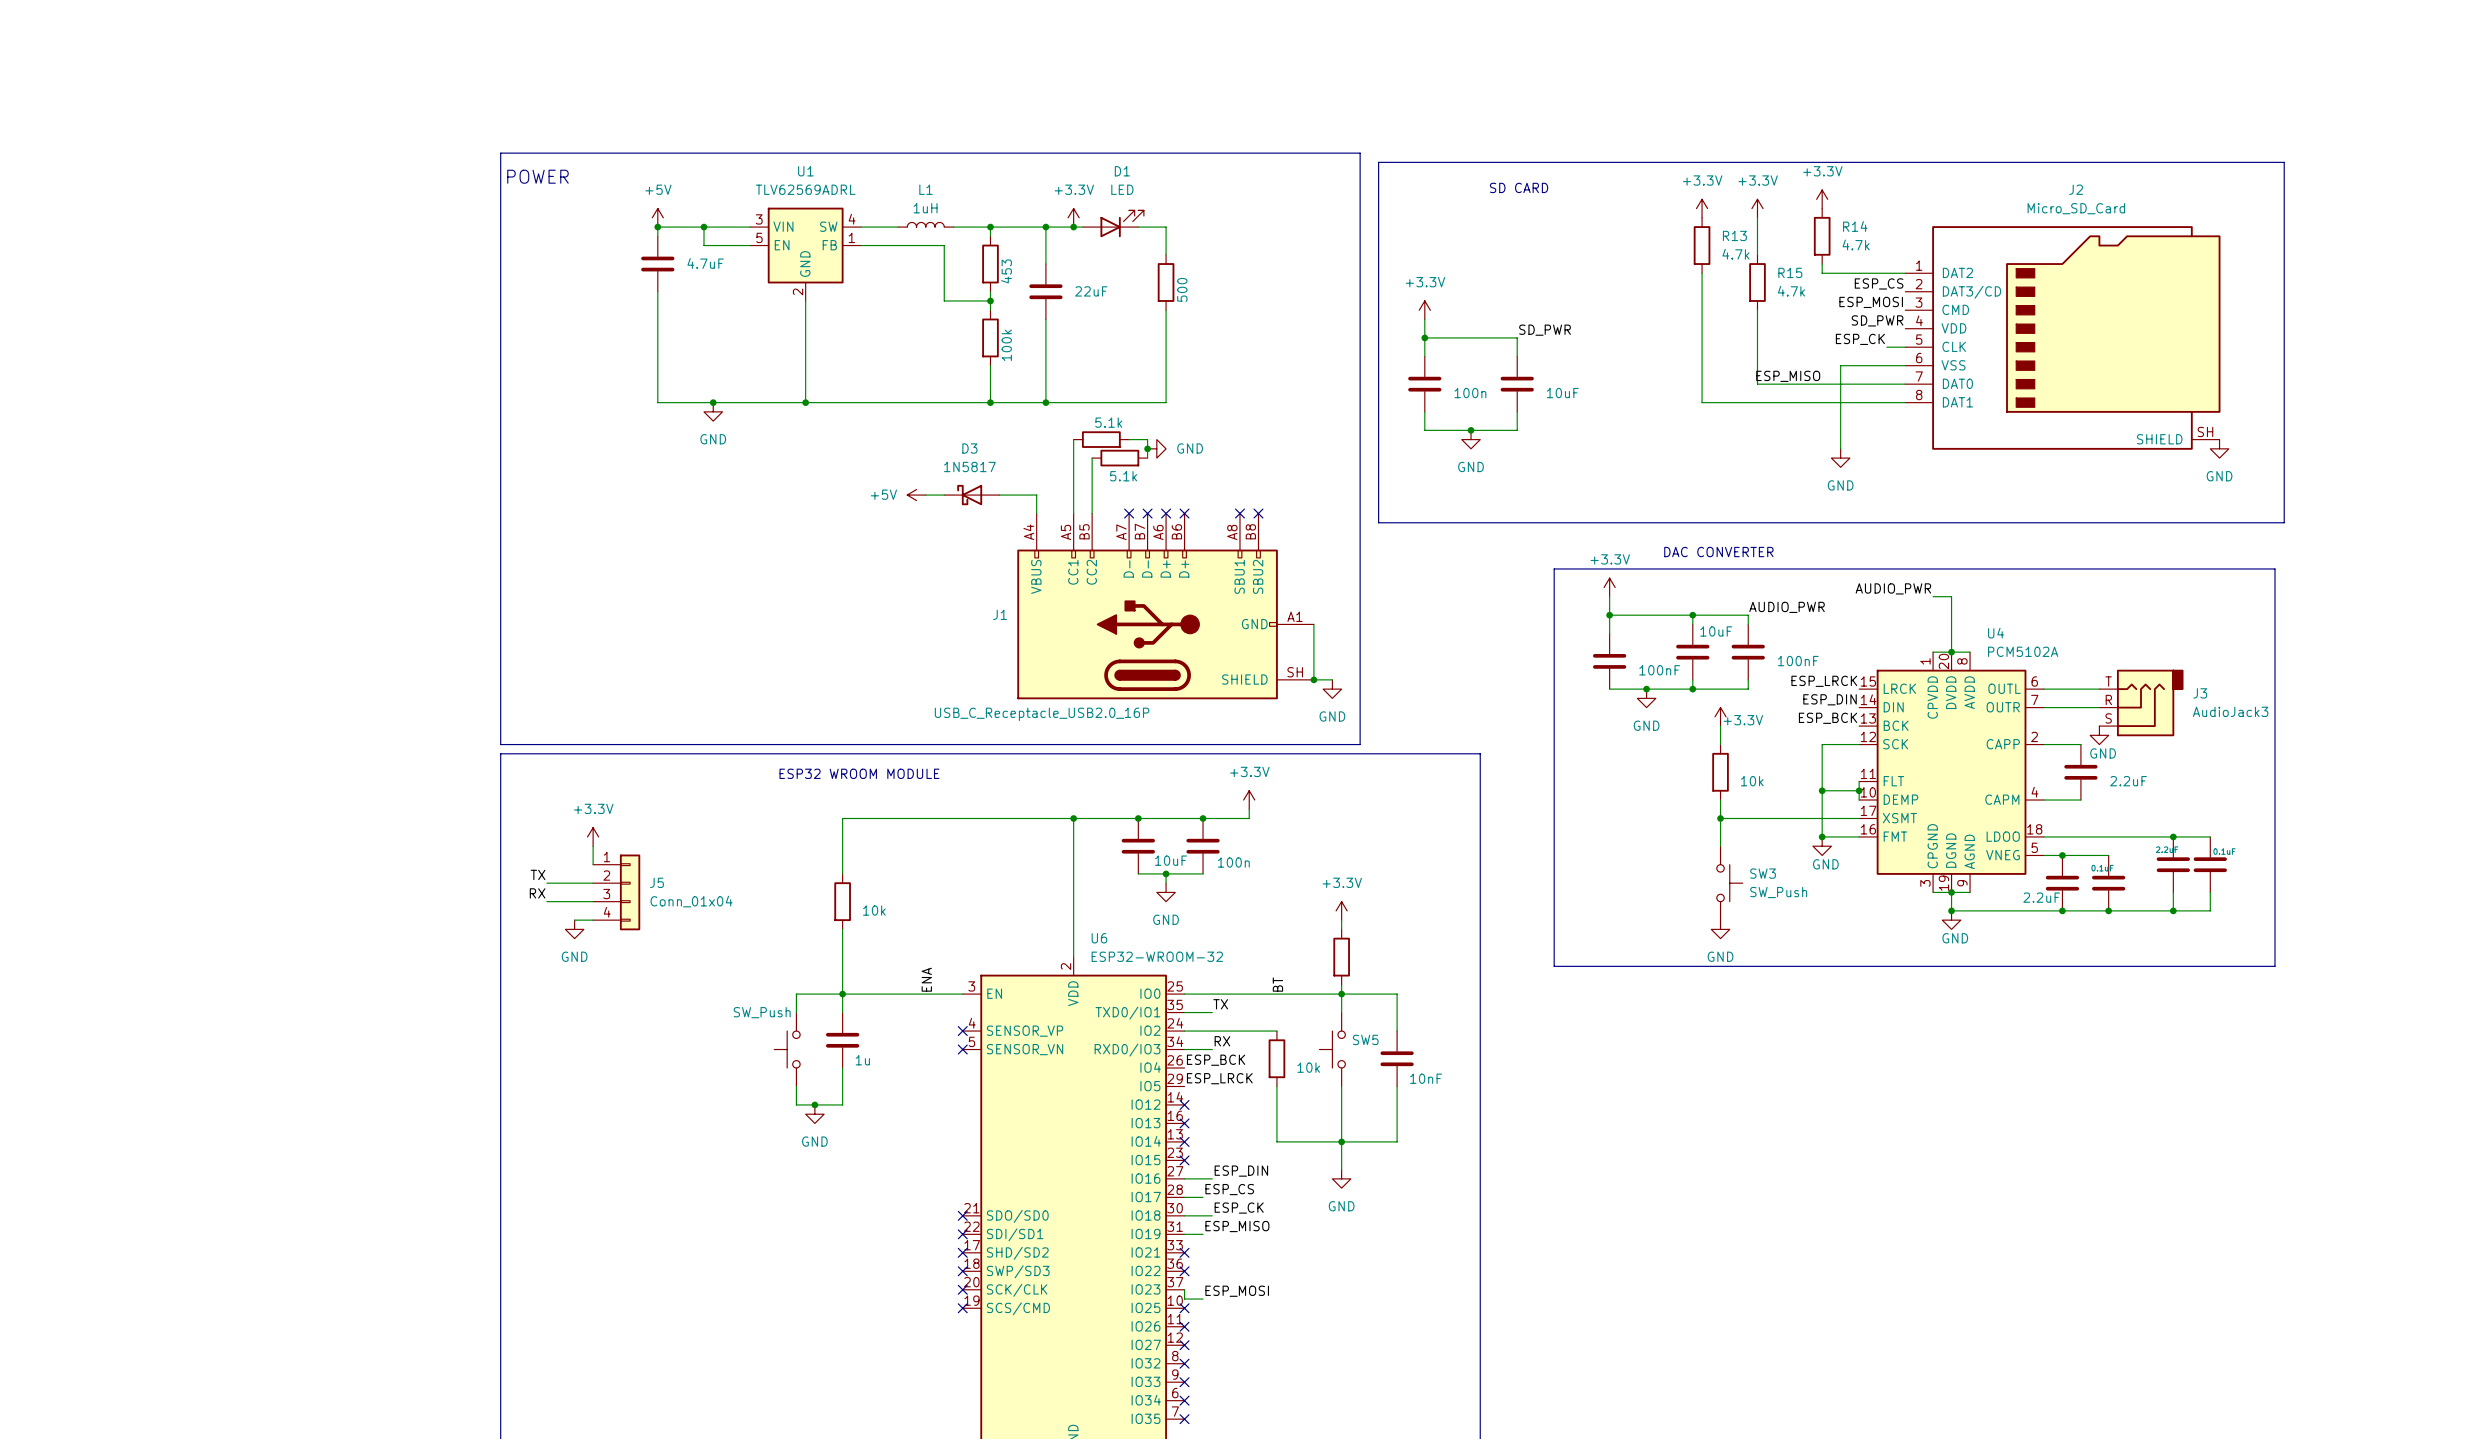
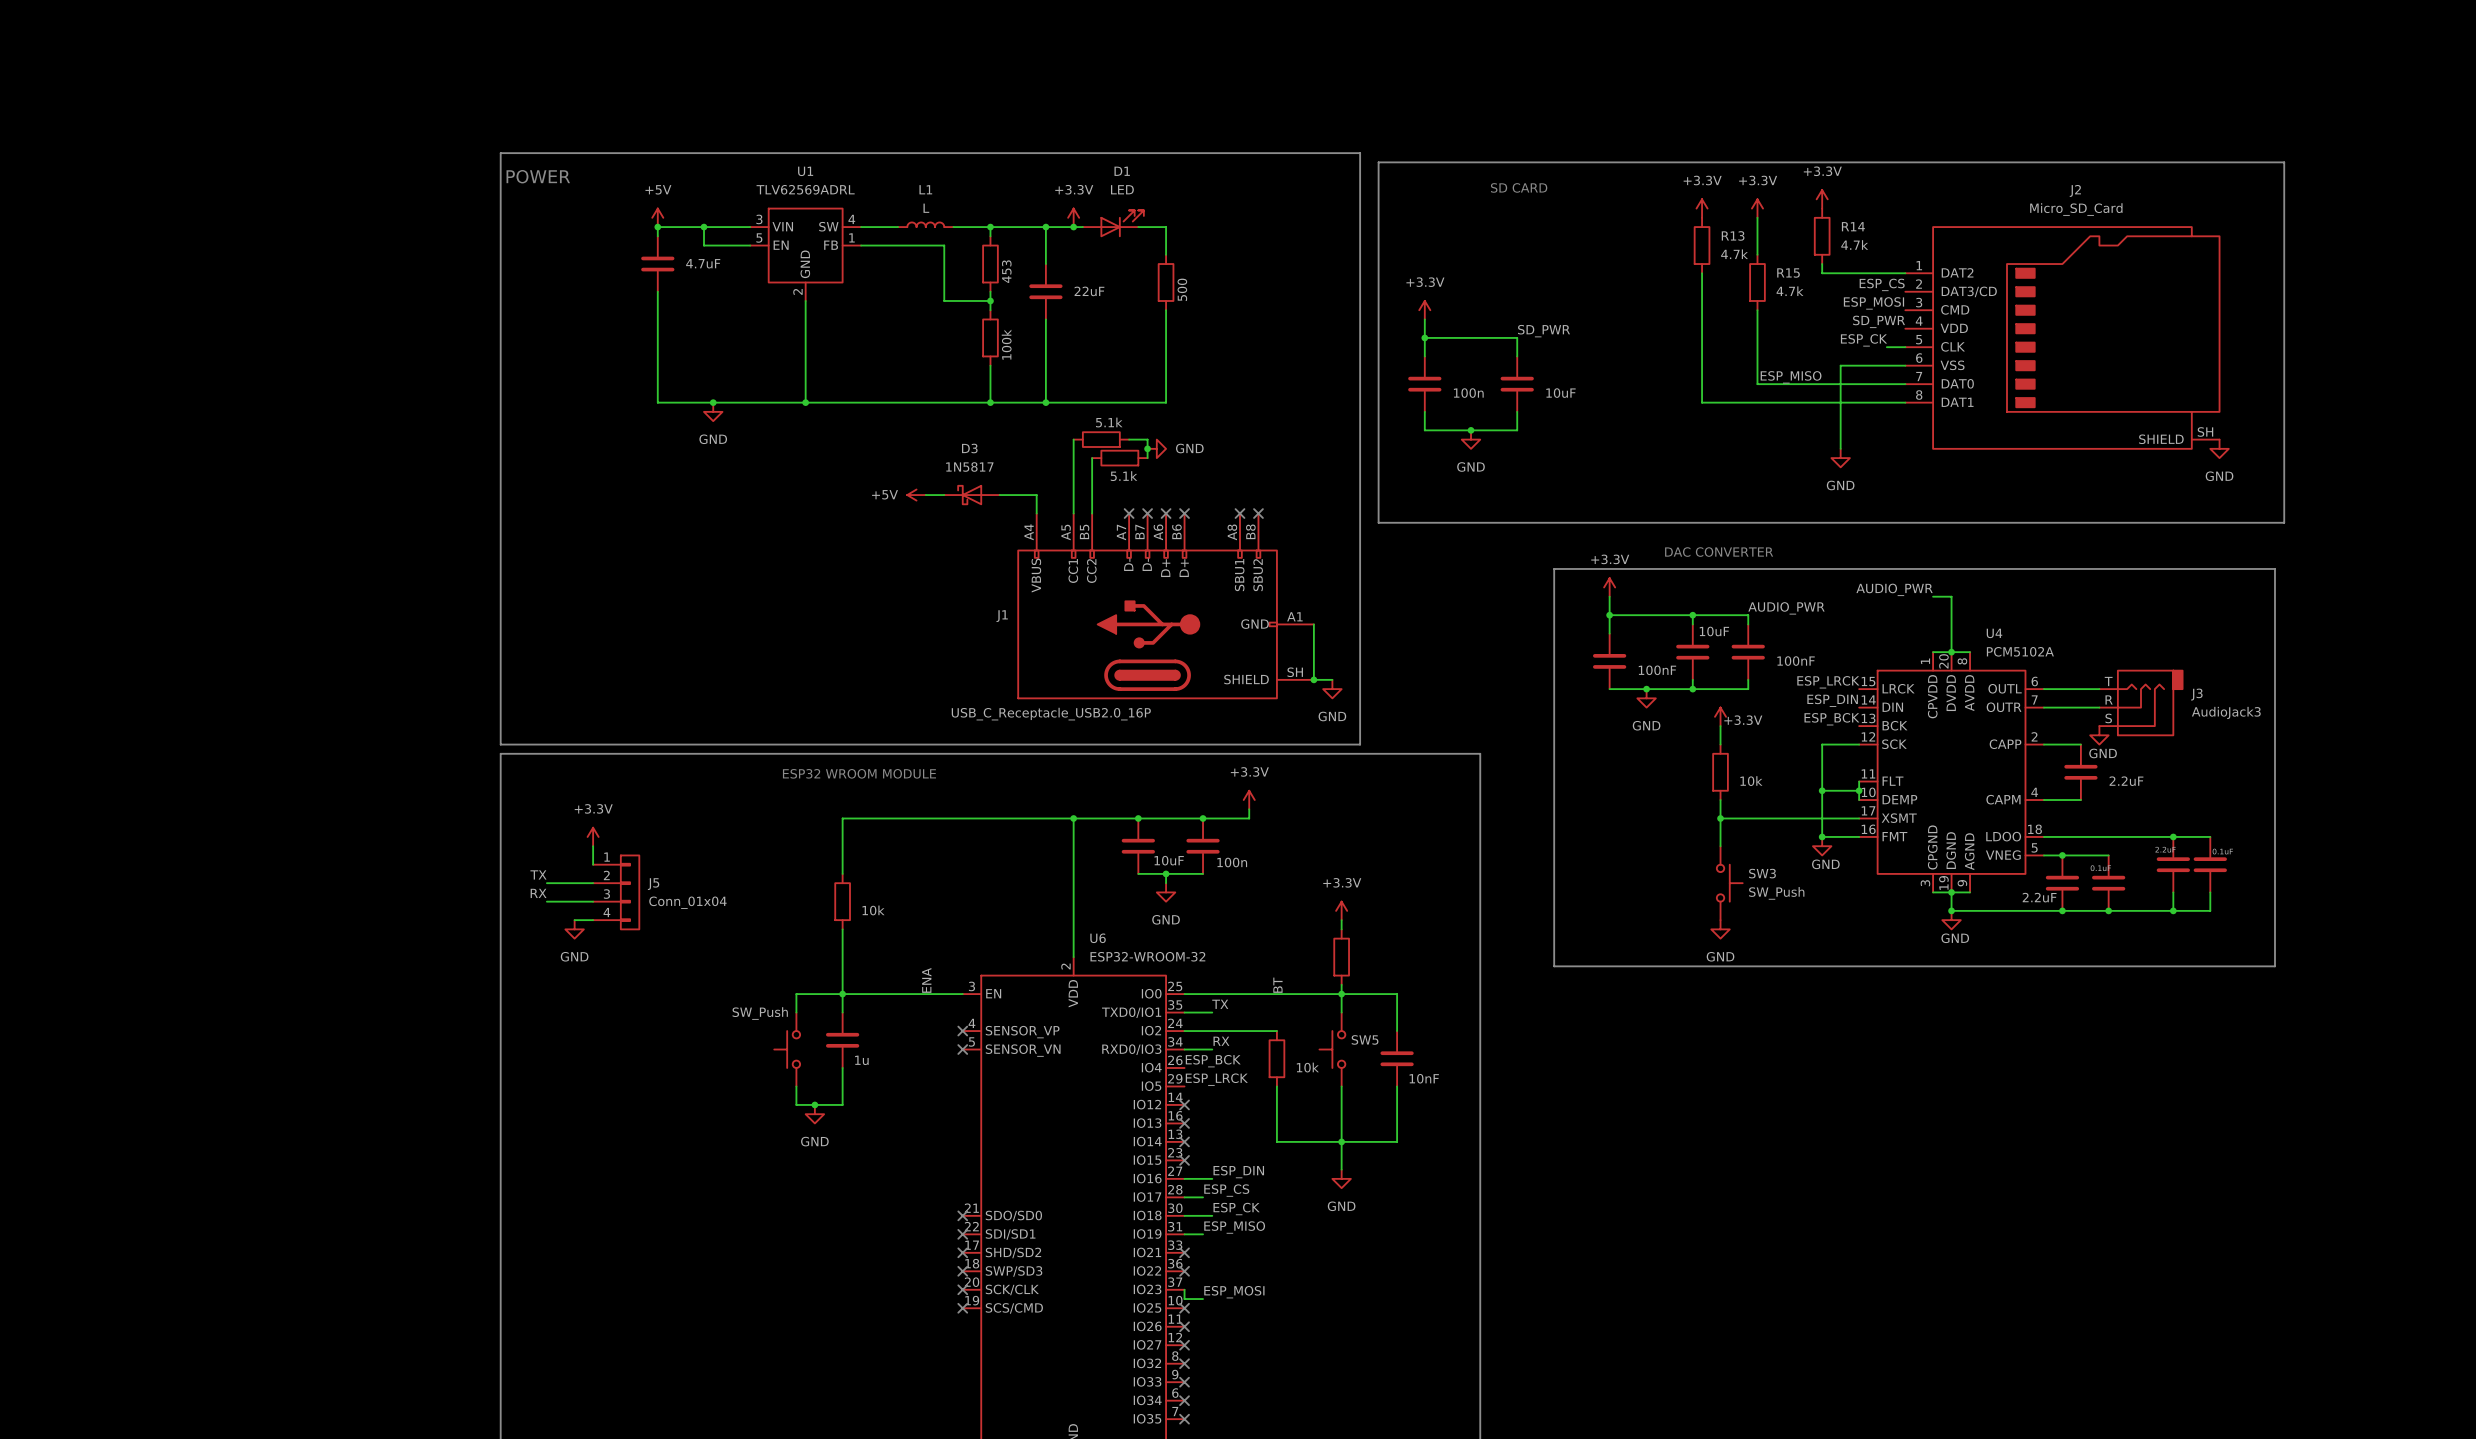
L1 value: 1uH (925, 208) -> L (926, 208)

